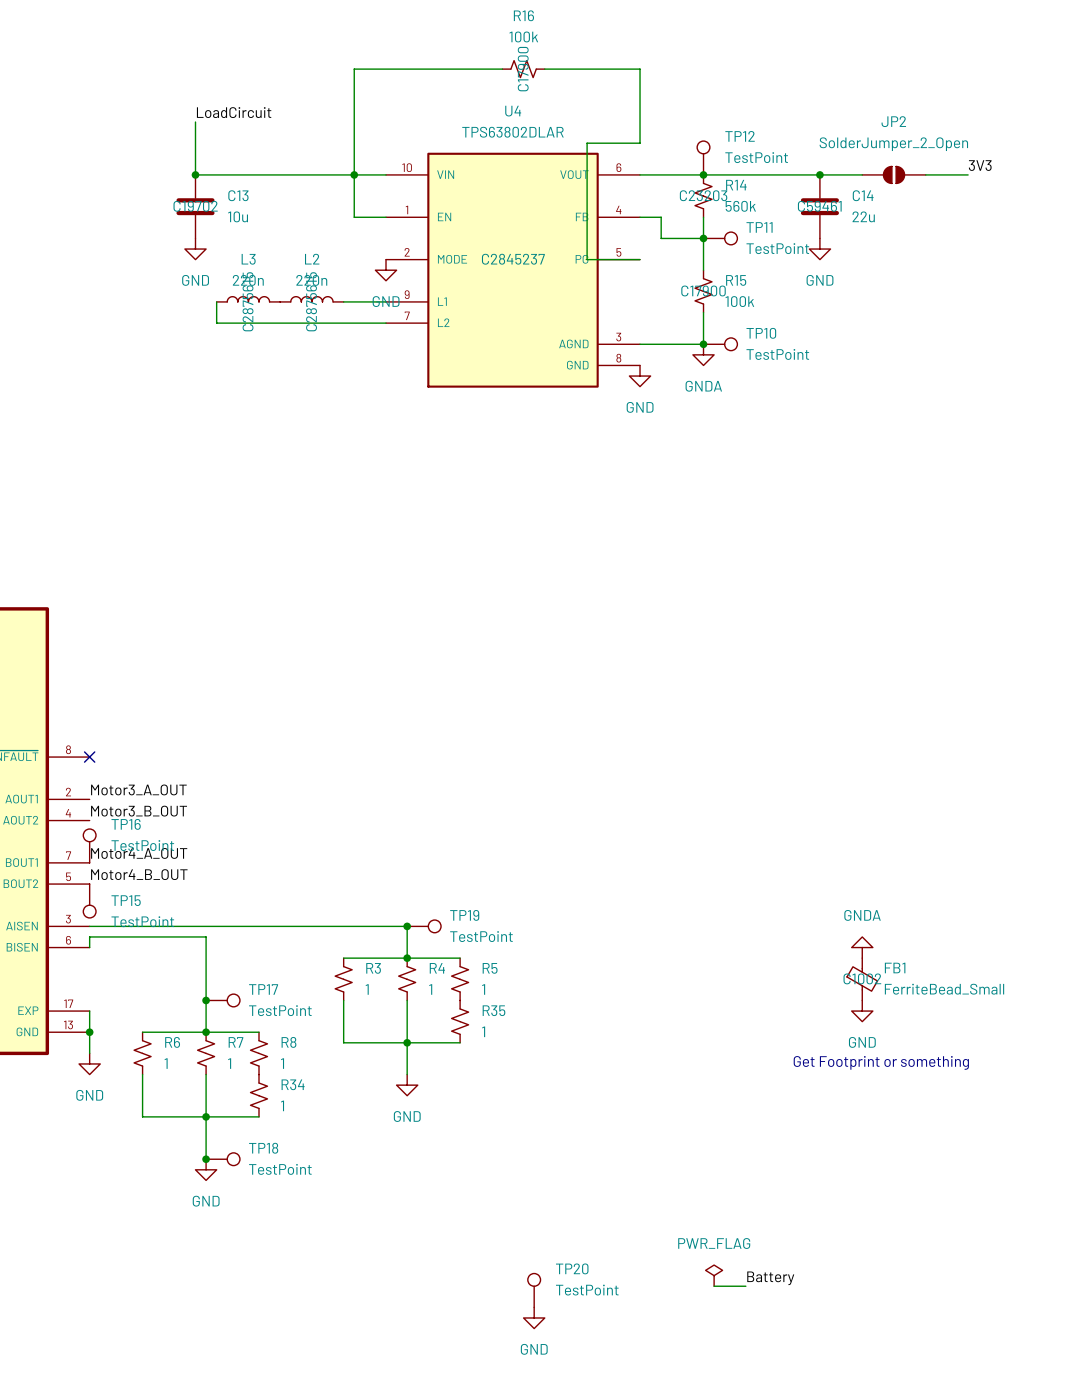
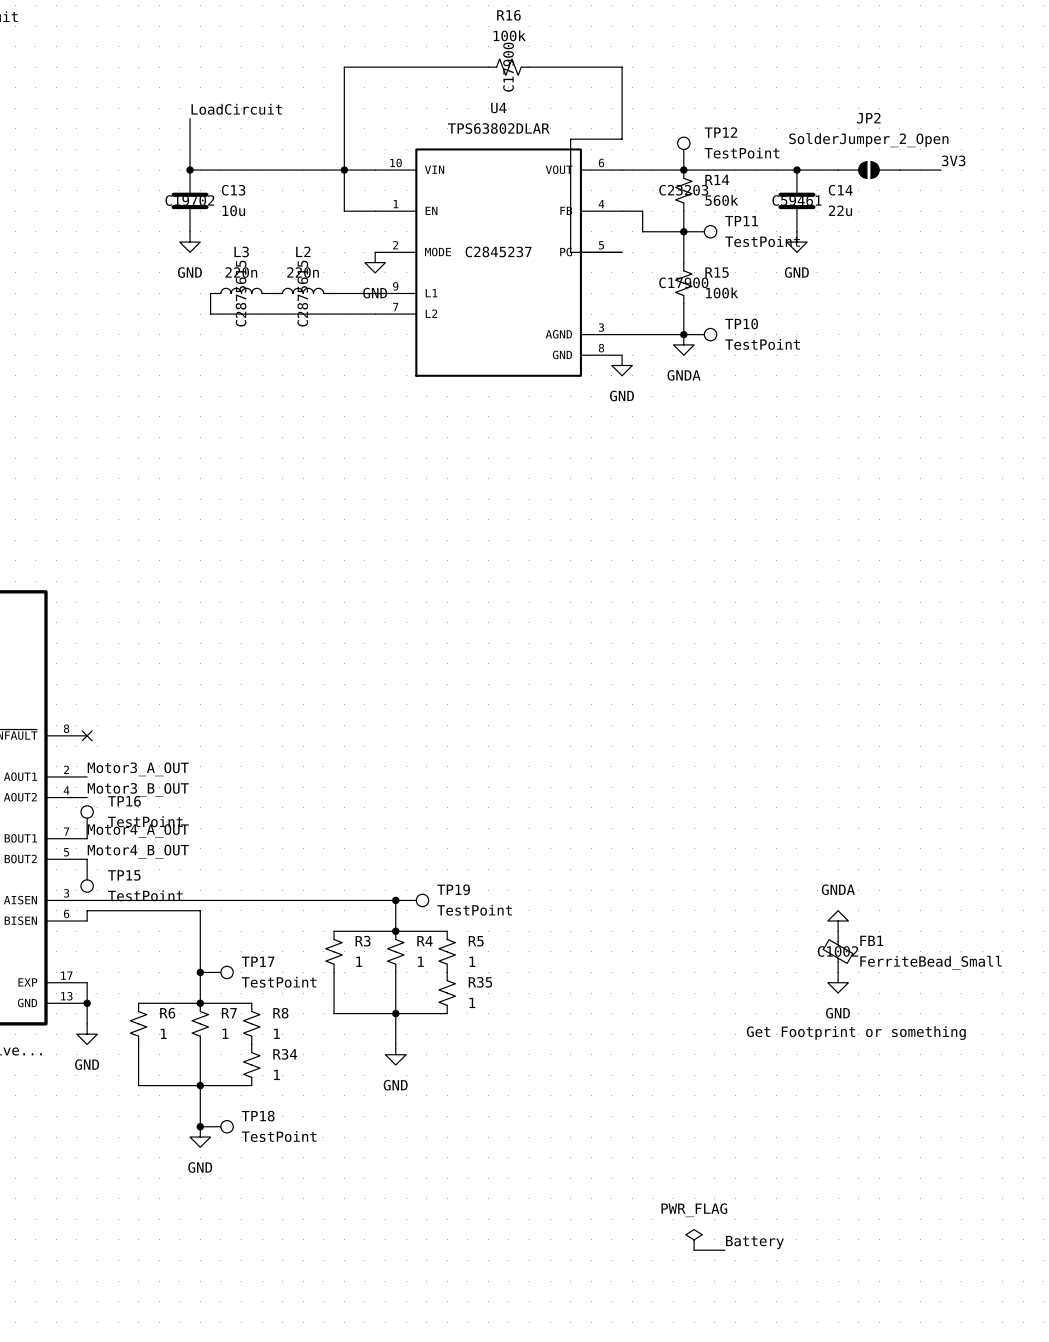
TP20: TestPoint (534, 1290) -> none
power symbol: GND (534, 1317) -> none

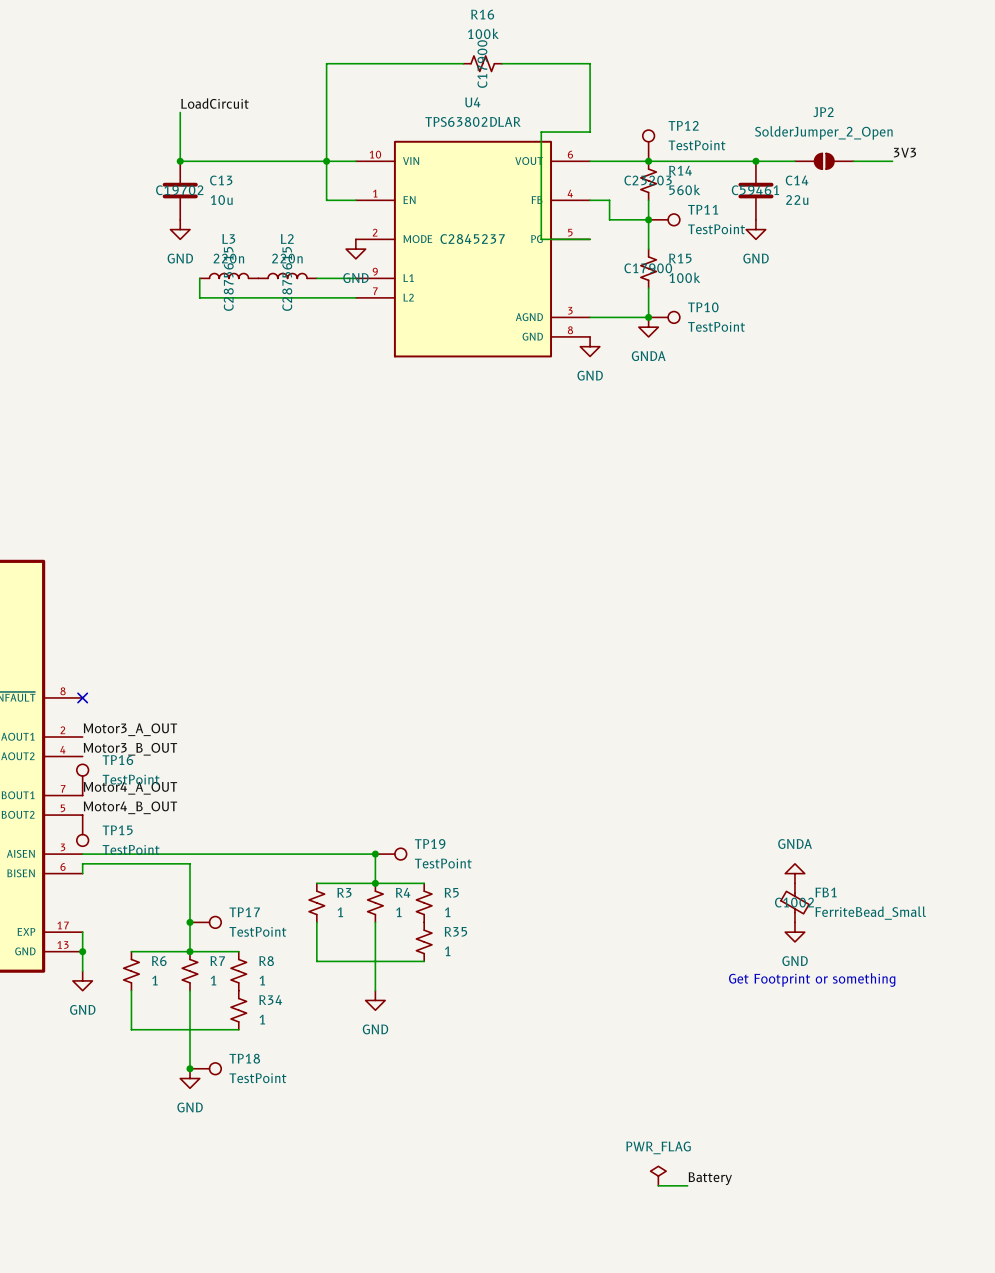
junction: (395, 1013) -> none
junction: (200, 1085) -> none

